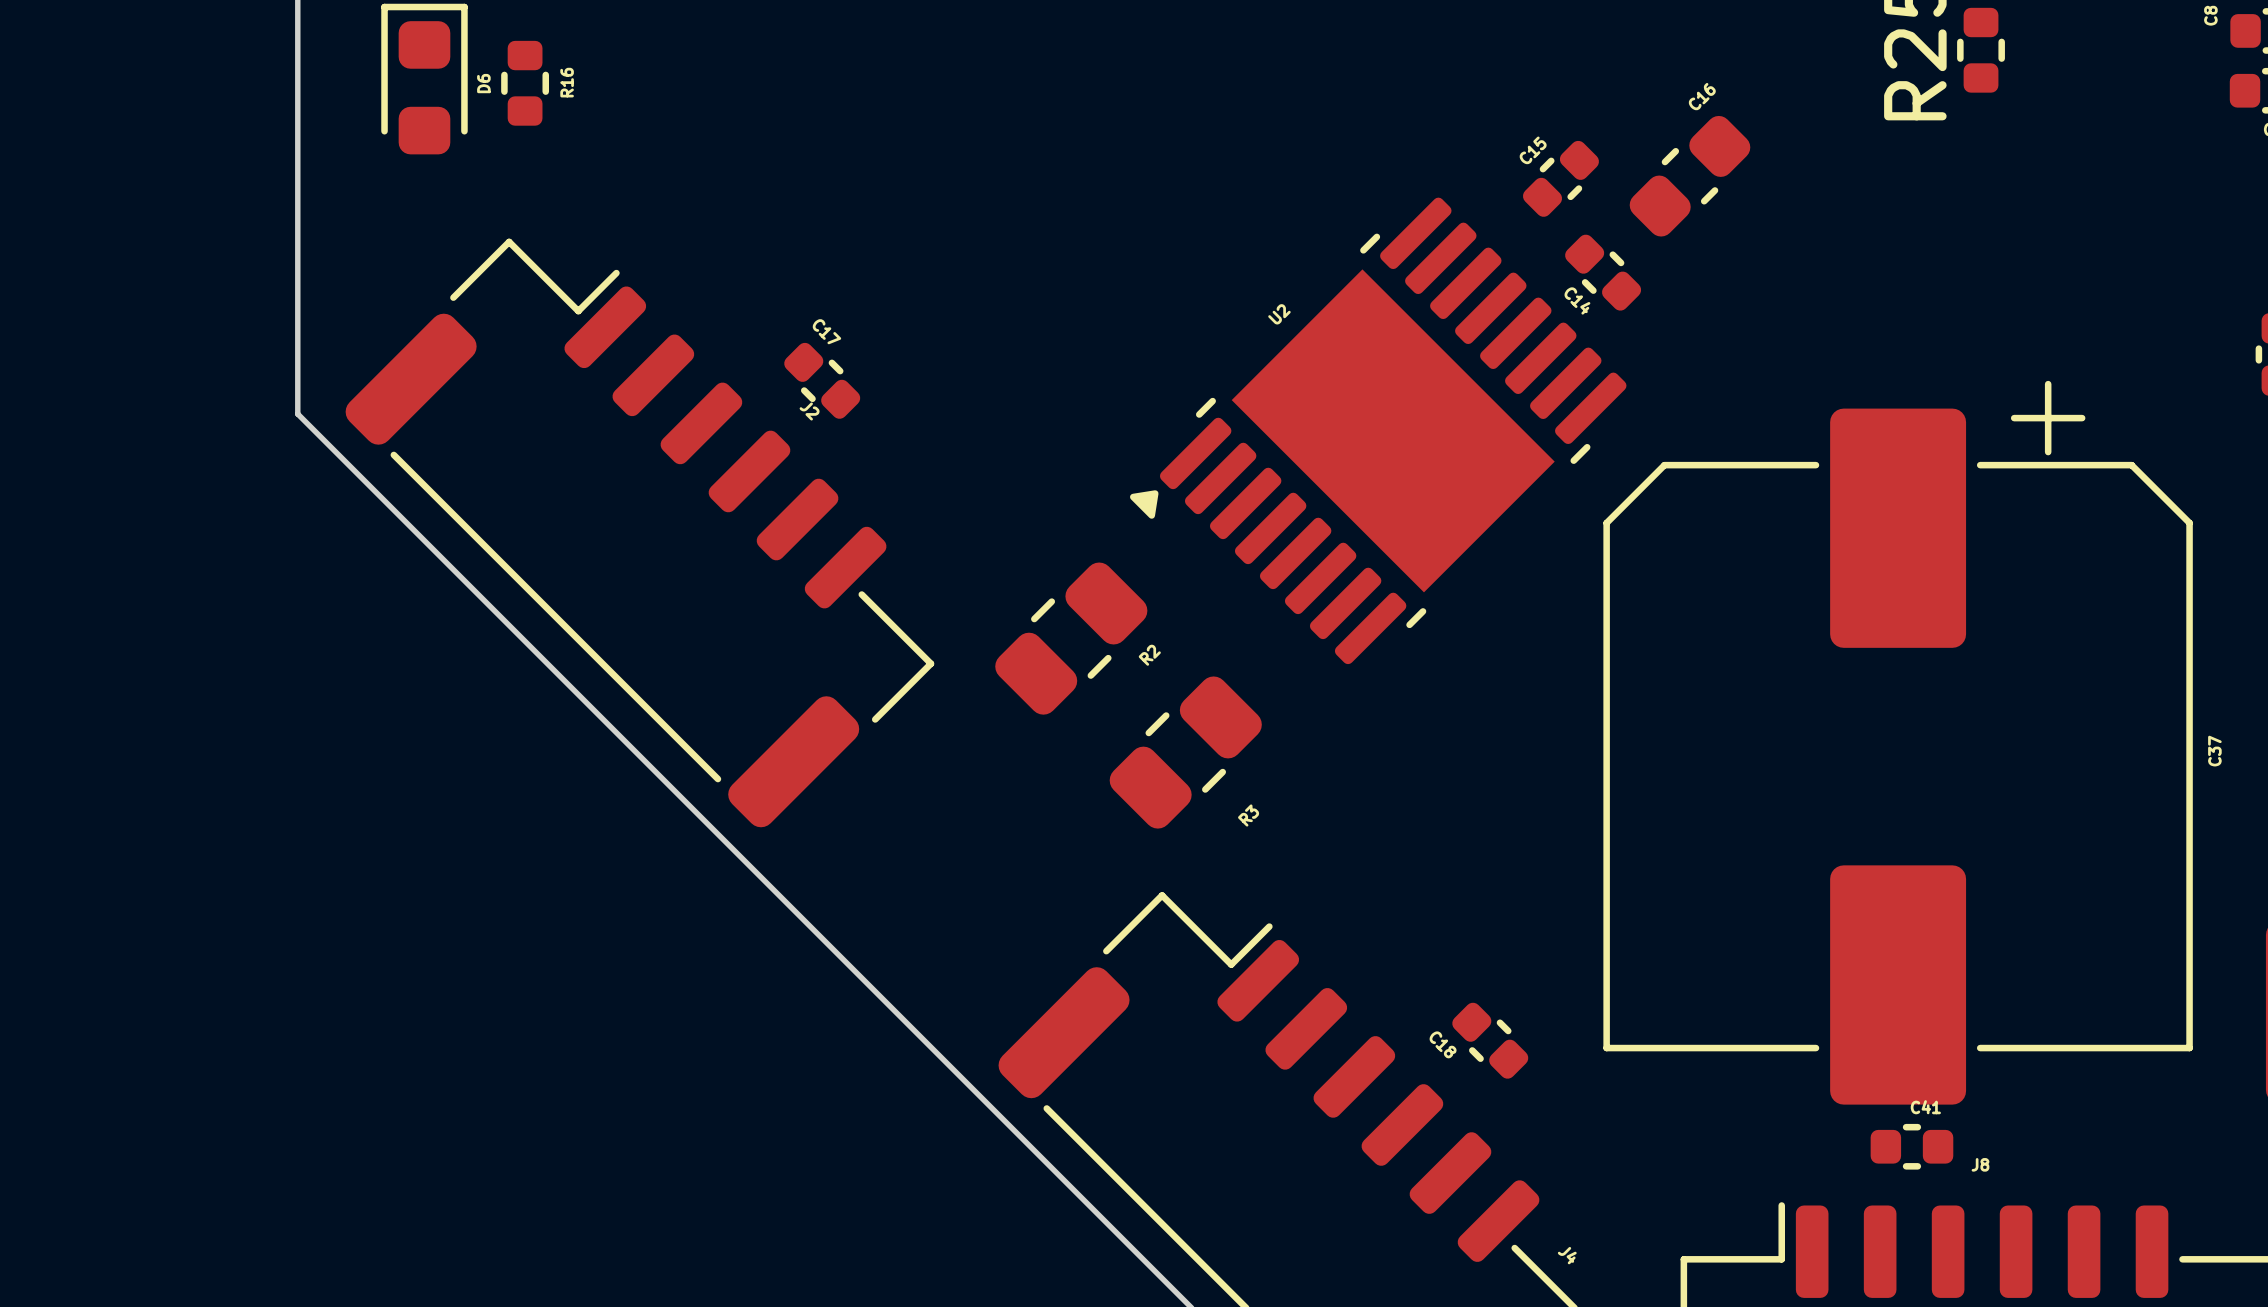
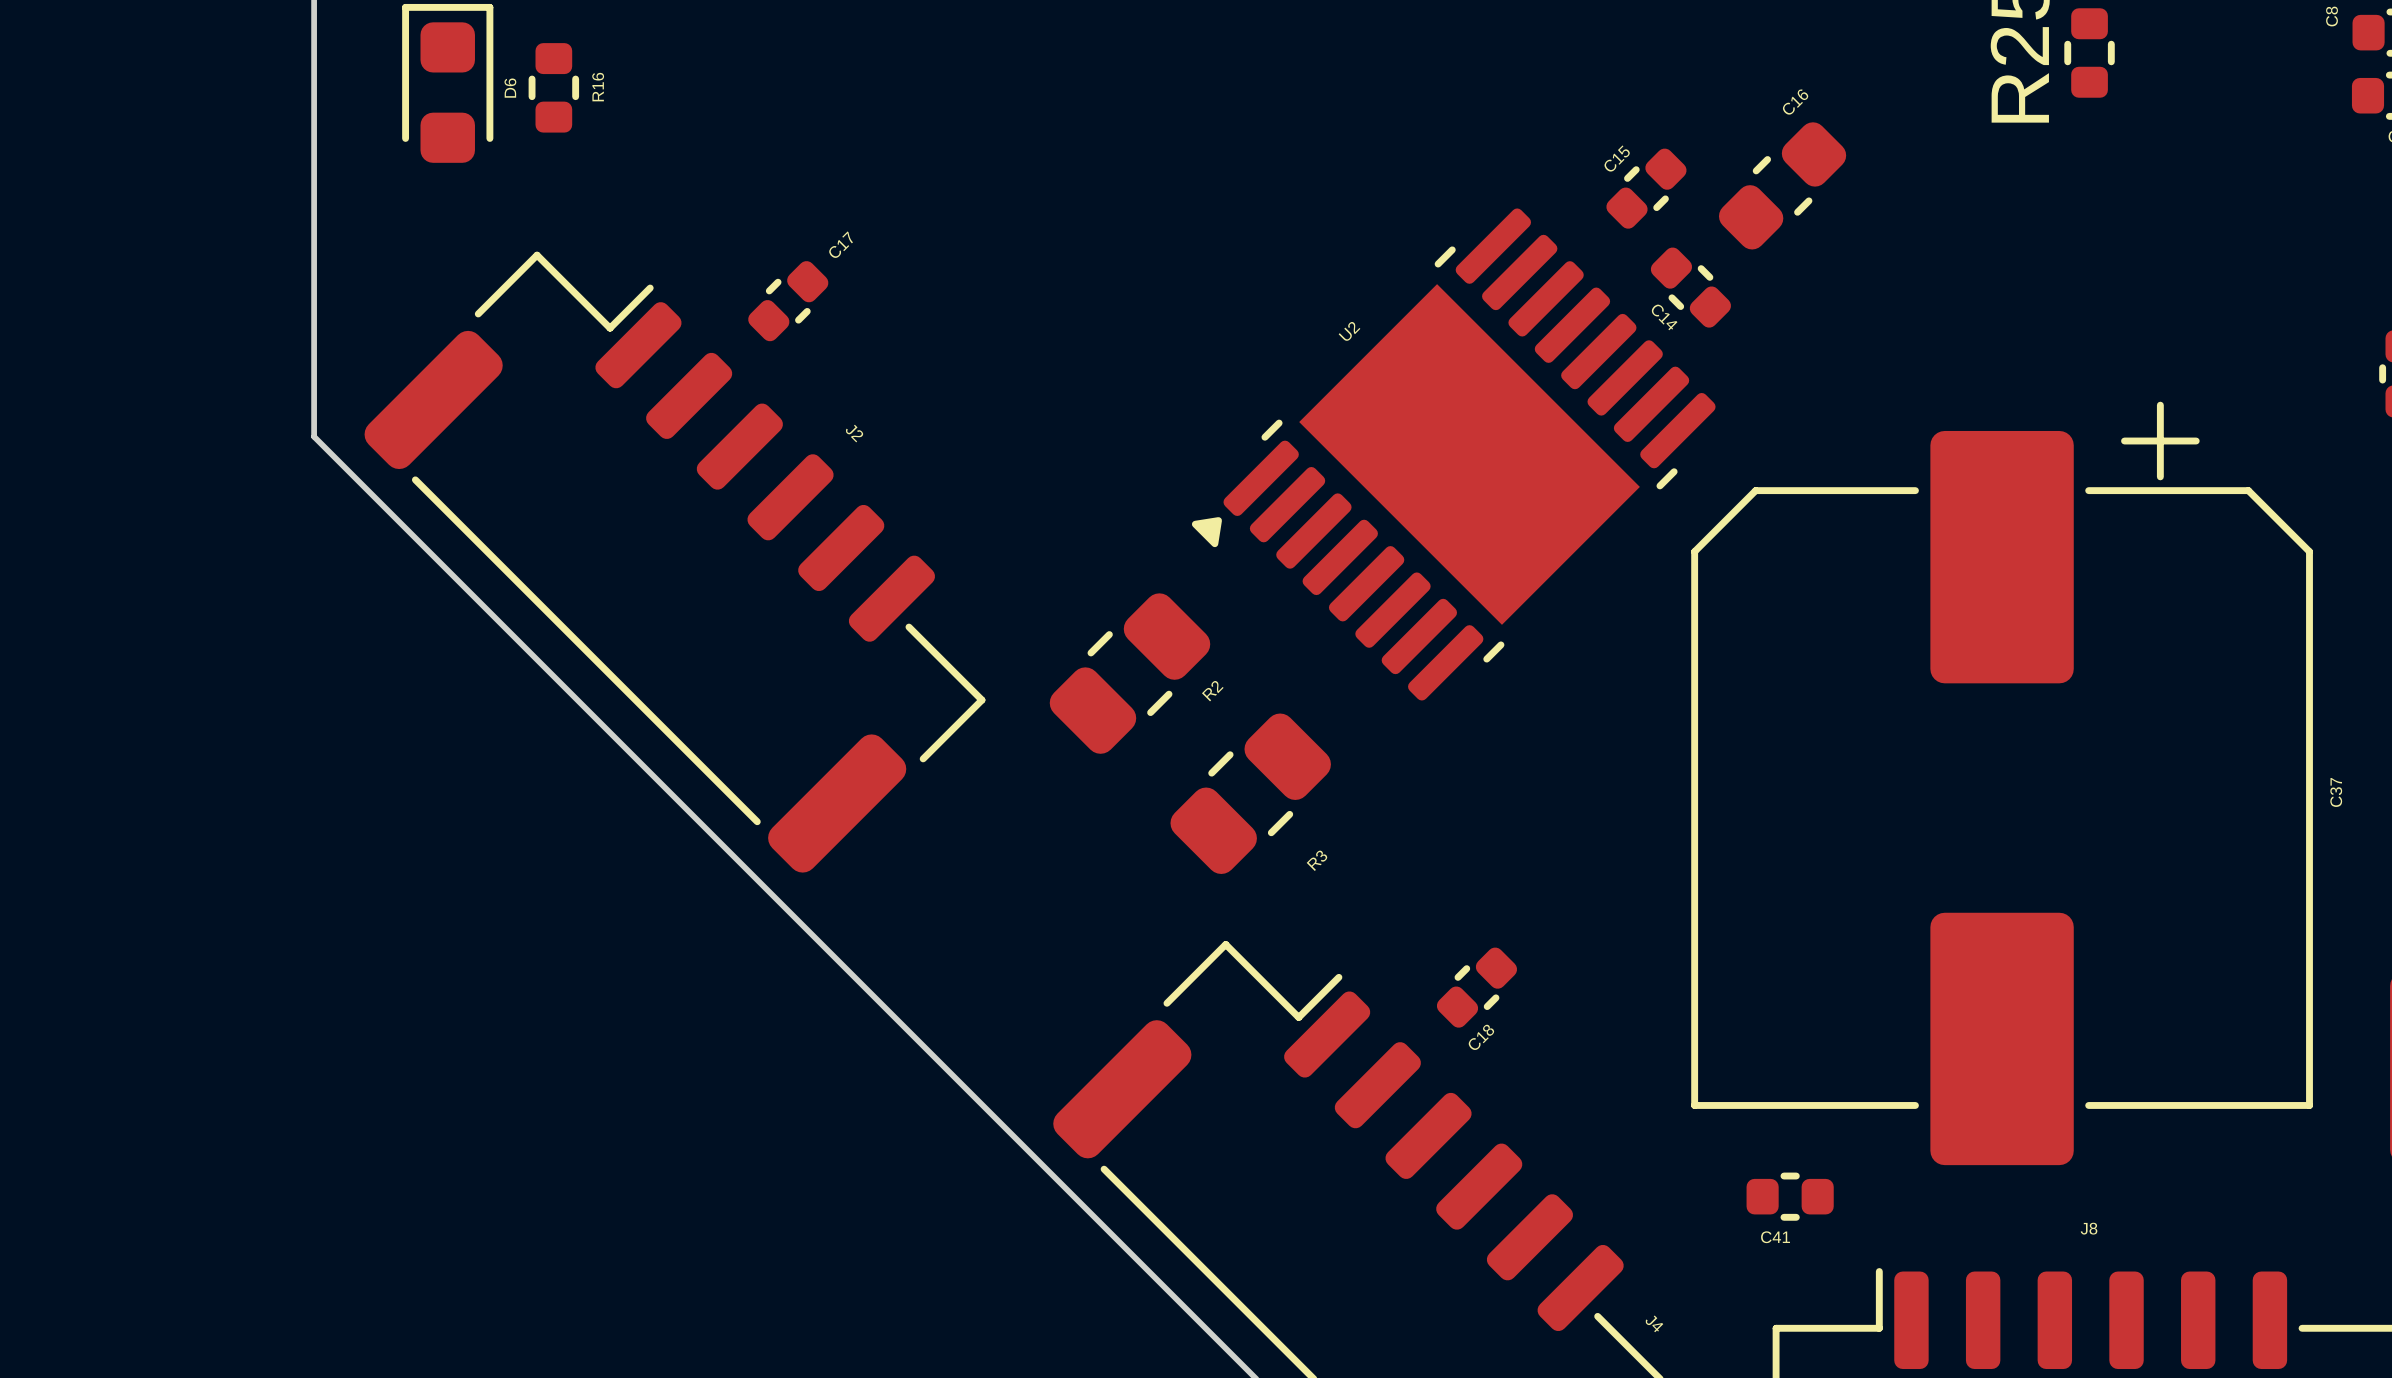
C17 rotation: 0° (822, 380) -> 90° clockwise (788, 301)
C17 position: (822, 380) -> (788, 301)
C18 rotation: 0° (1490, 1040) -> 90° clockwise (1476, 987)
C18 position: (1490, 1040) -> (1476, 987)
C41 name position: C41 (1925, 1107) -> C41 (1775, 1237)
C41 position: (1911, 1146) -> (1790, 1196)

